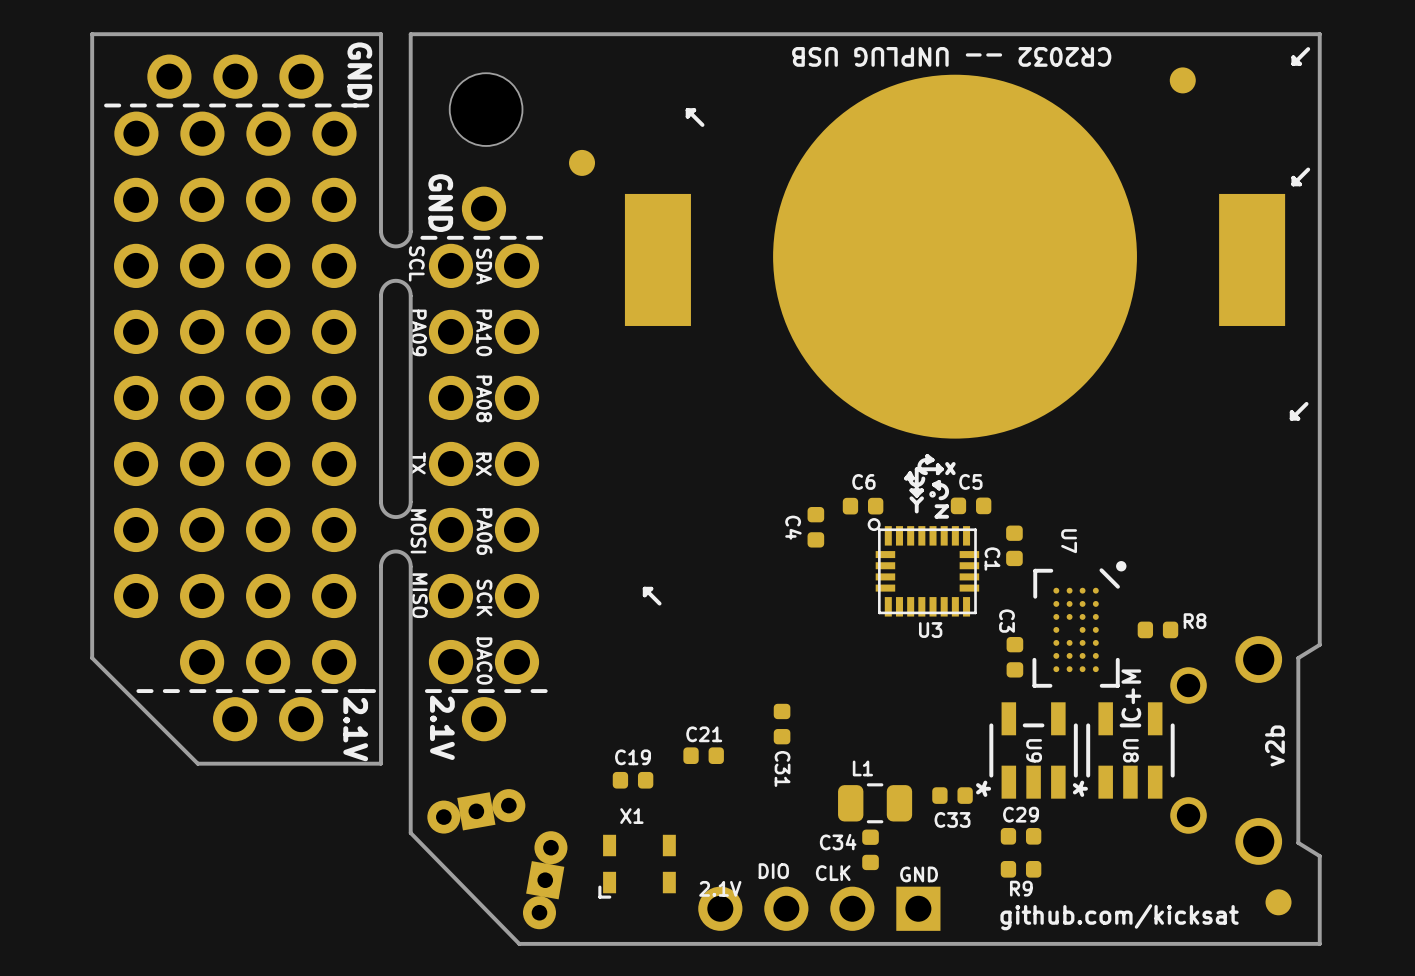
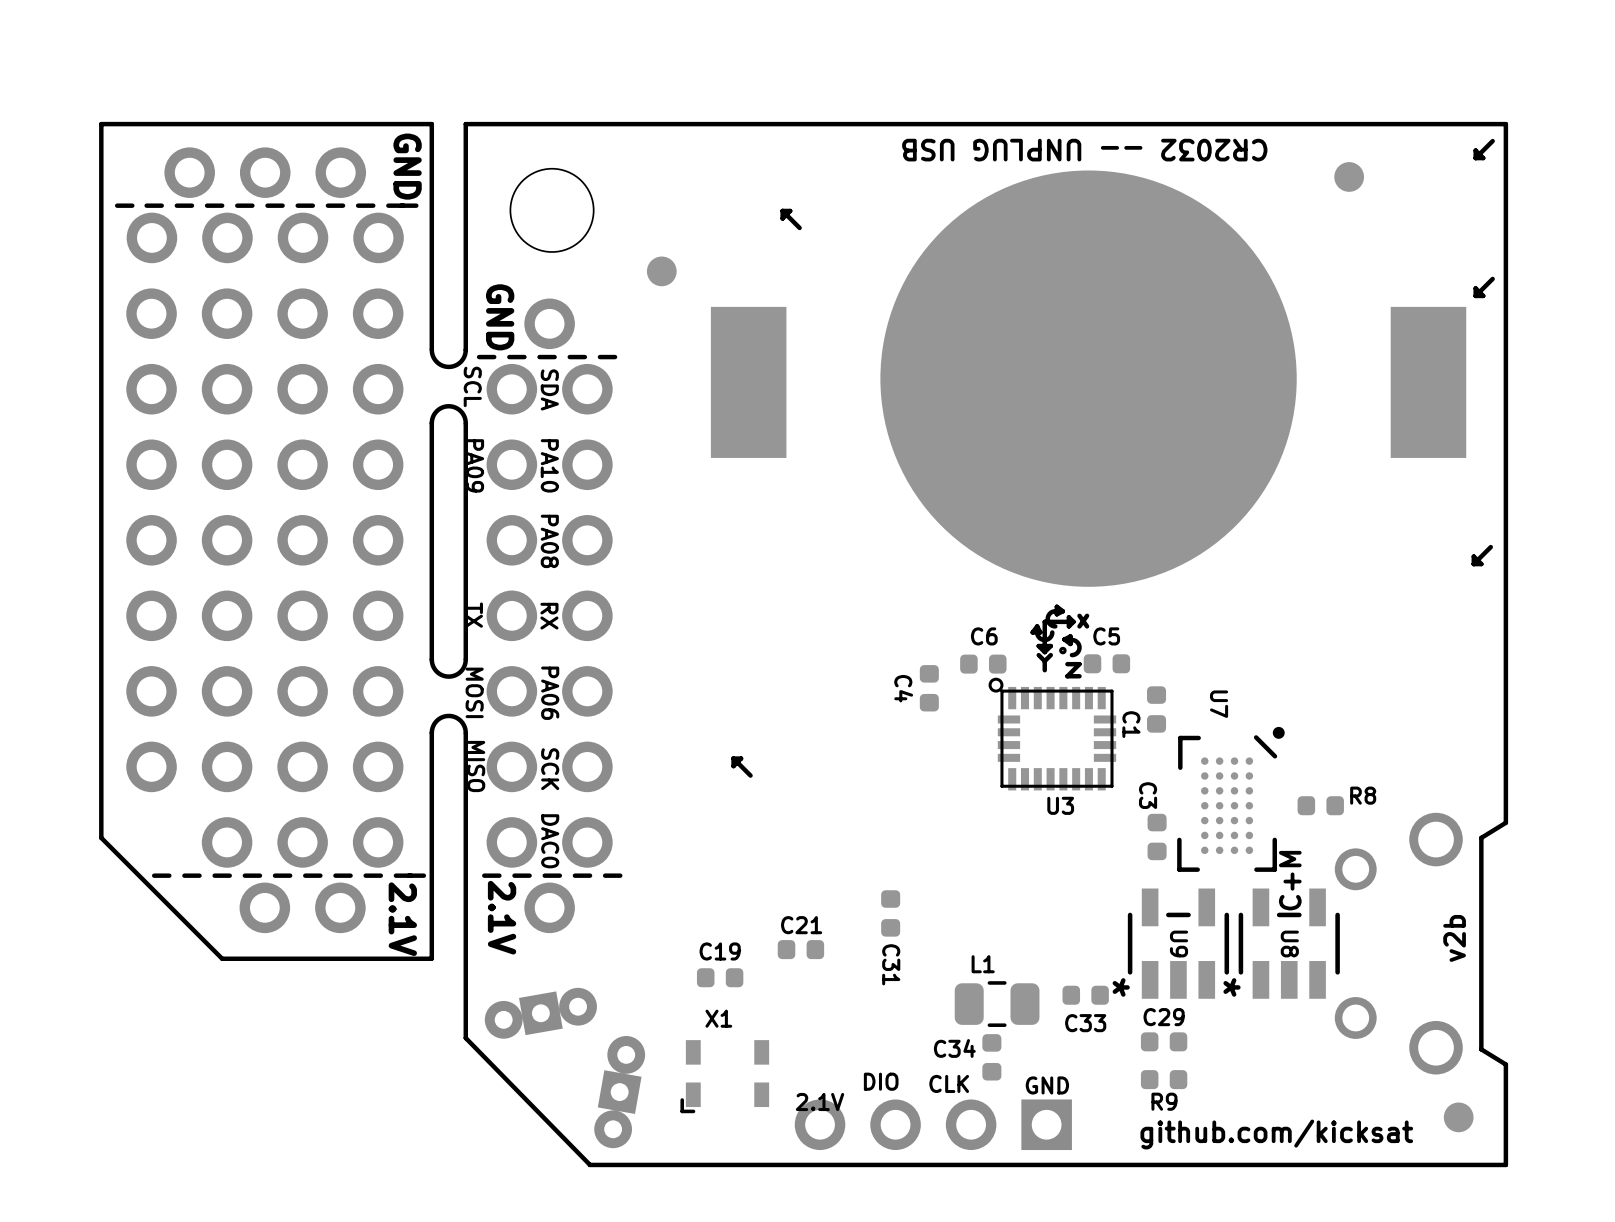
U7 footprint: [1032, 561, 1127, 688] -> [1177, 726, 1285, 872]

